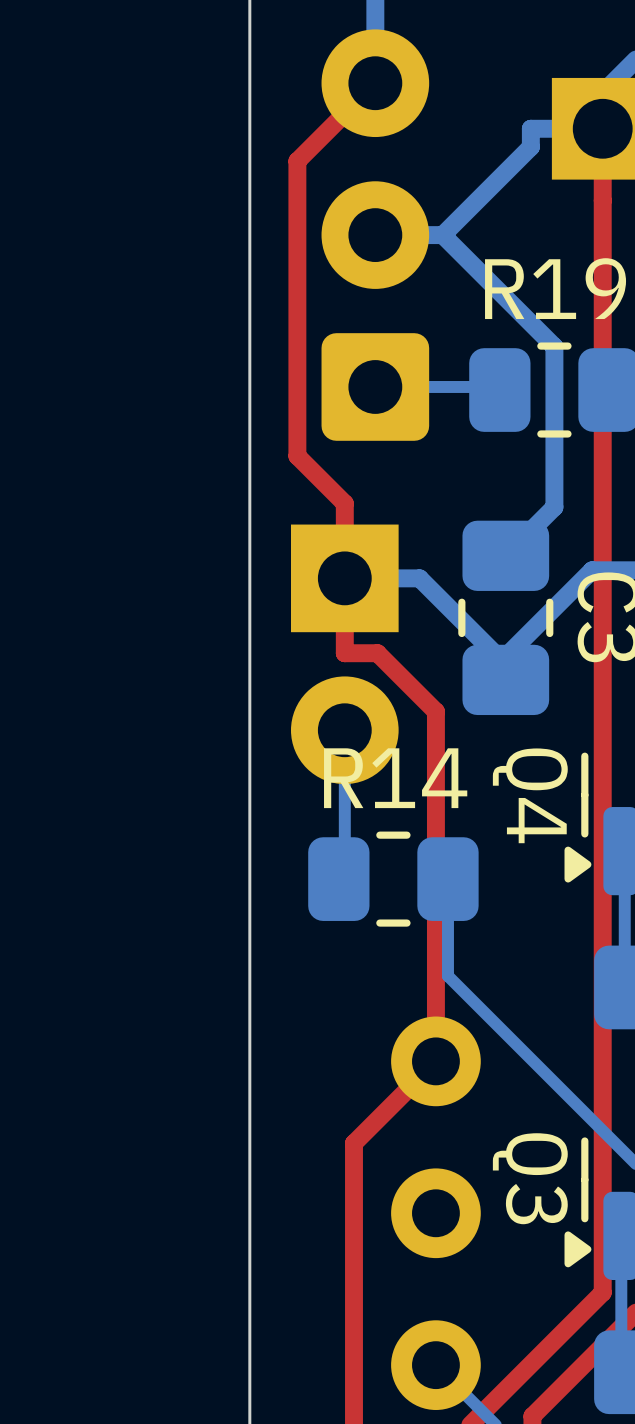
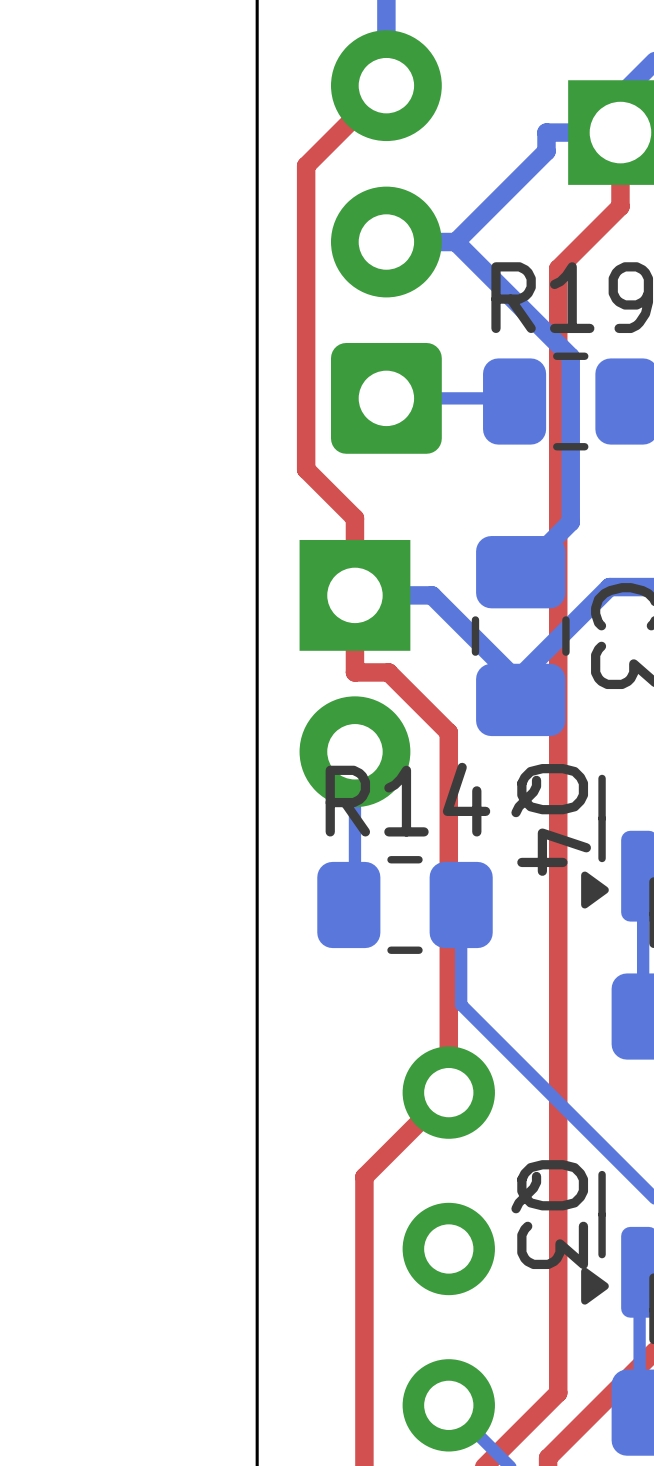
top track: (602, 200) (602, 1292) (542, 1353) -> (620, 206) (558, 268) (558, 1392)

